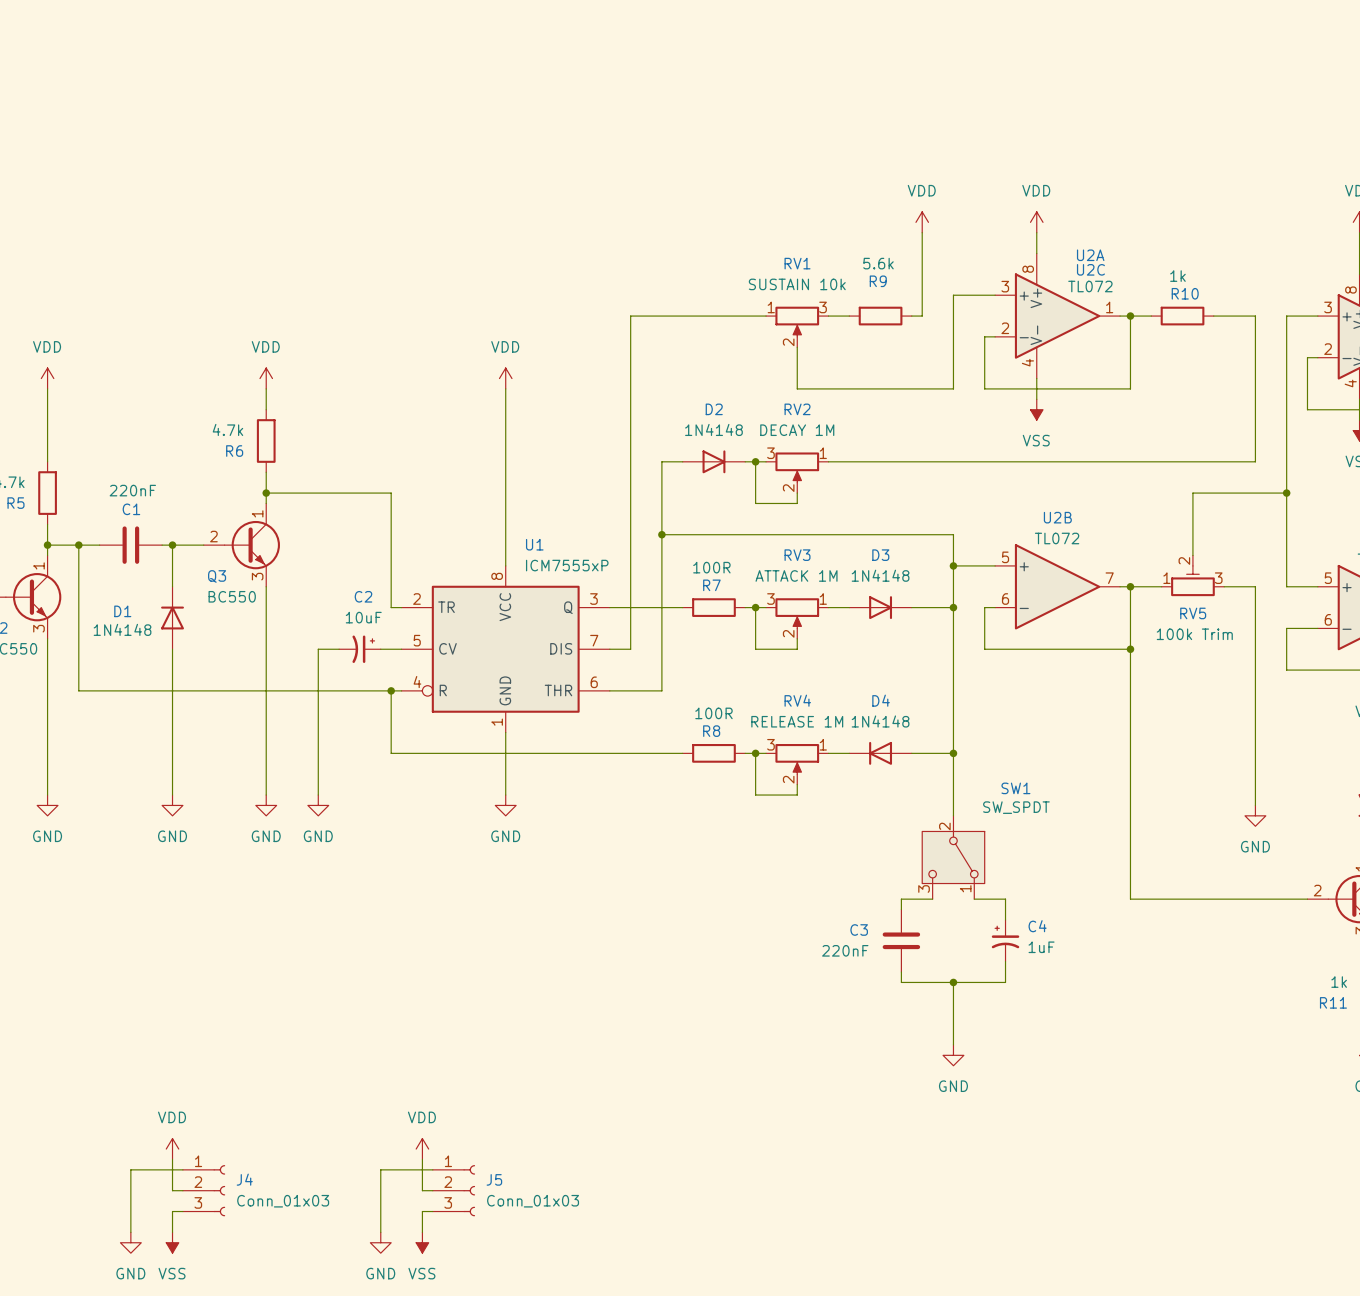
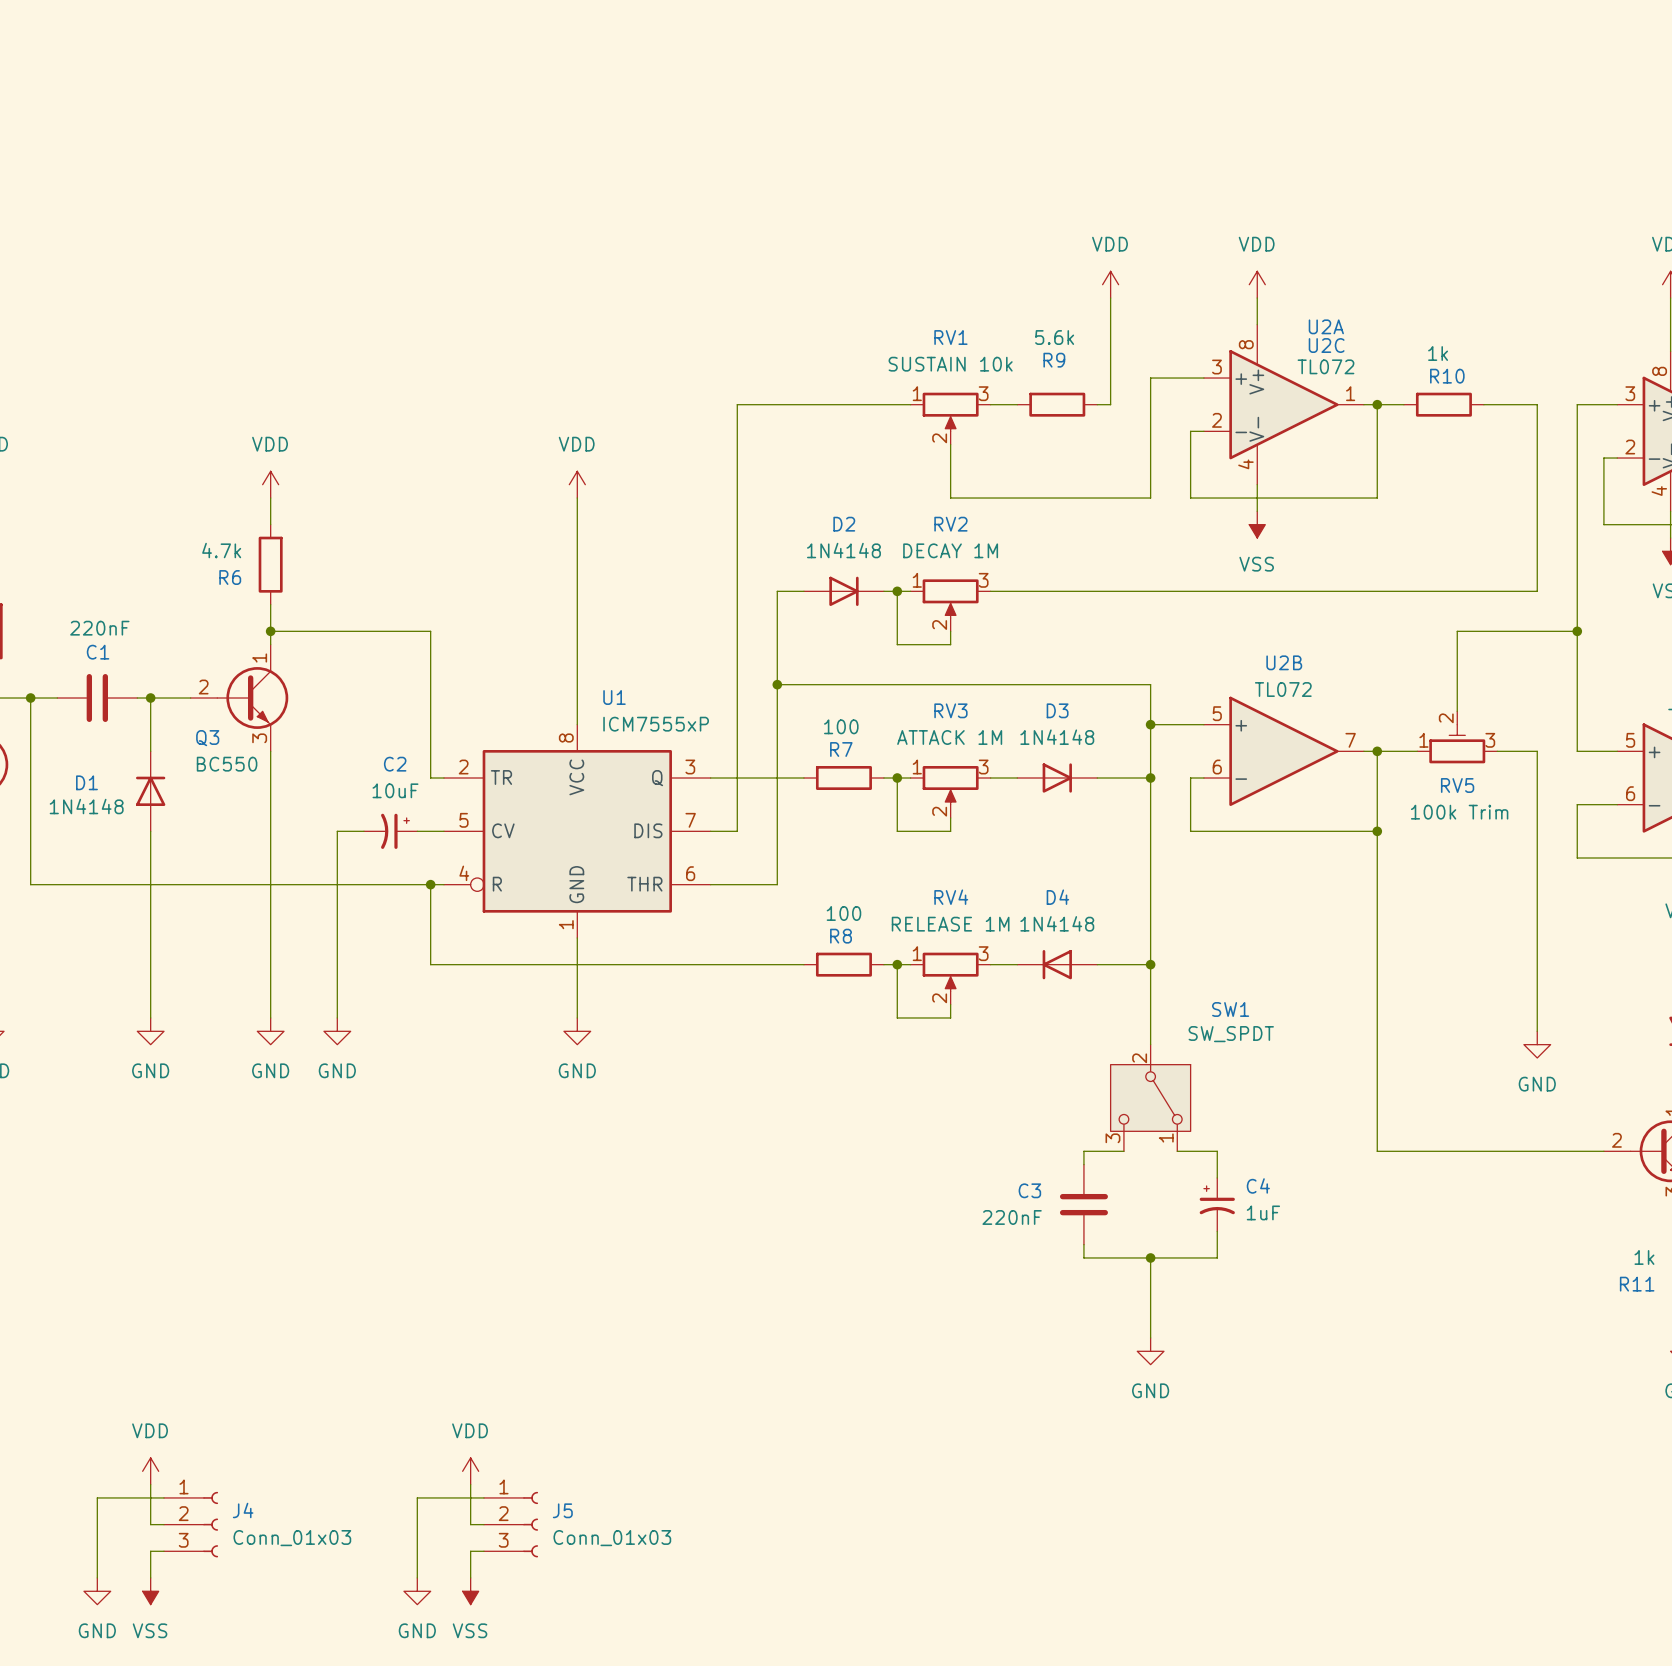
RV2 flip: as is (797, 467) -> left-right (950, 598)
R7 value: 100R (711, 567) -> 100 (841, 726)
RV3 flip: as is (797, 613) -> left-right (950, 785)
R8 value: 100R (713, 713) -> 100 (843, 913)
RV4 flip: as is (797, 759) -> left-right (950, 971)

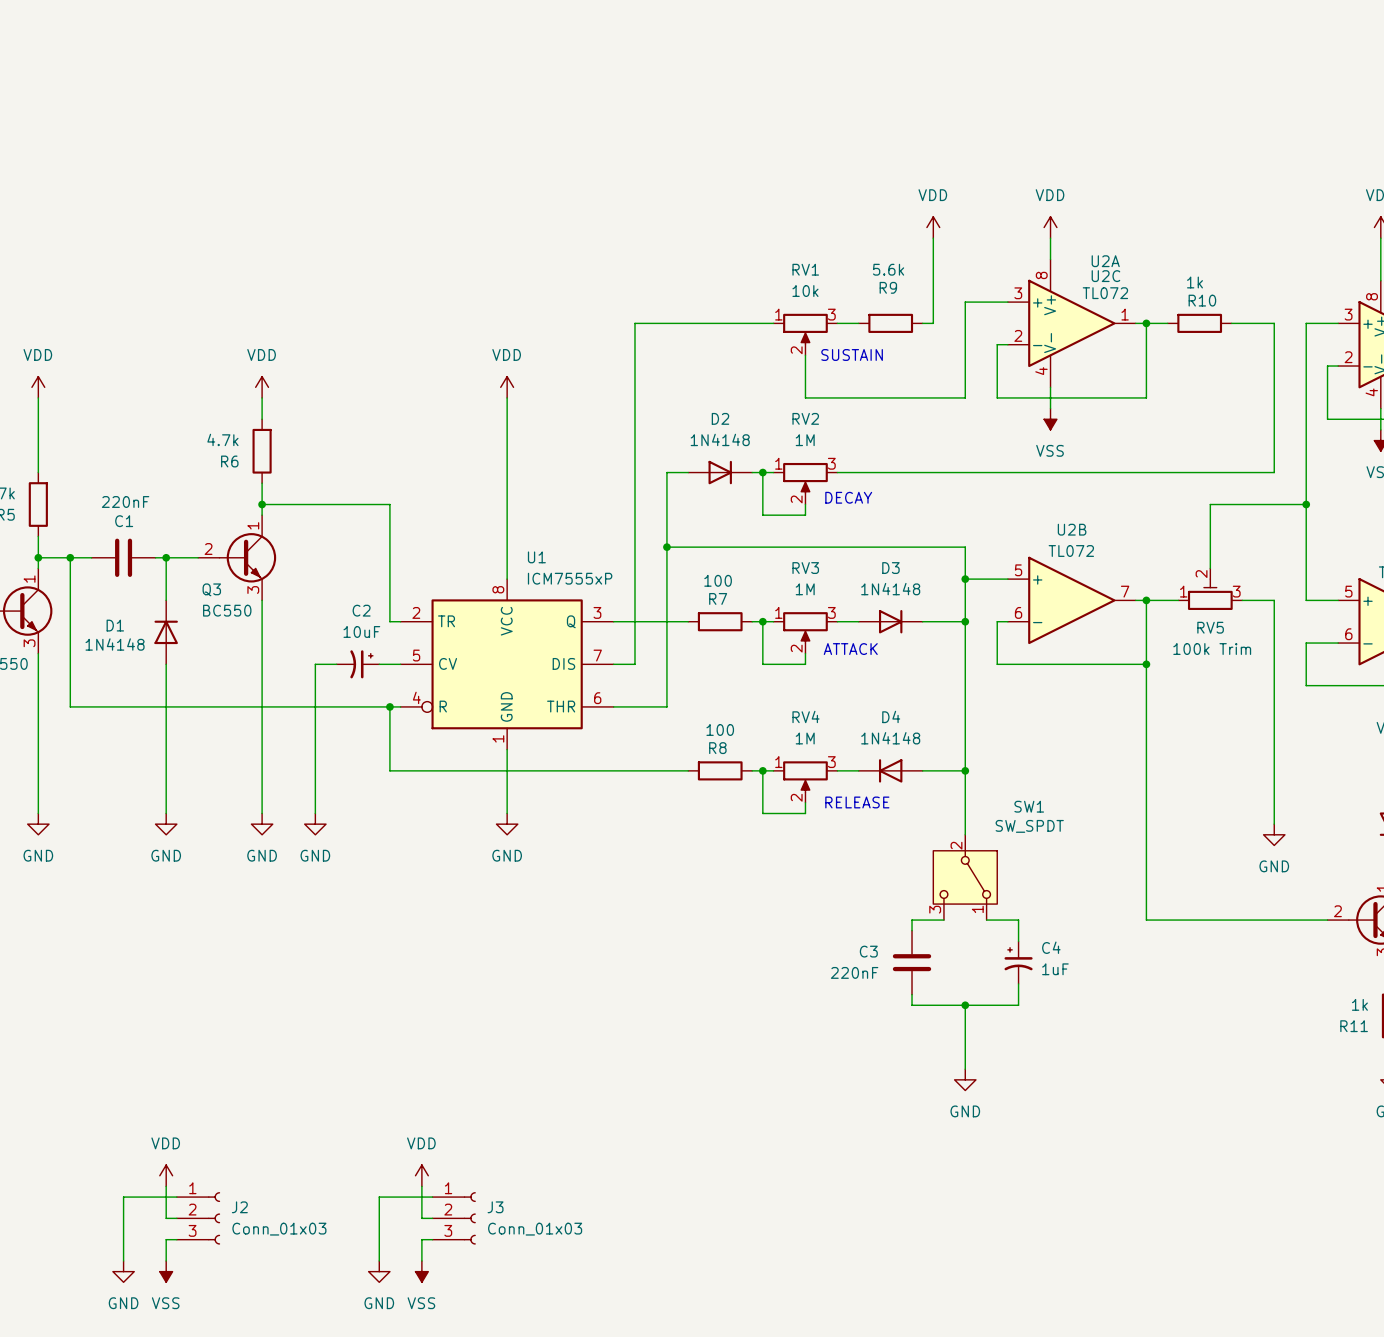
RV1 value: SUSTAIN 10k (950, 364) -> 10k (805, 291)
text: none -> SUSTAIN (852, 354)
RV2 value: DECAY 1M (950, 550) -> 1M (805, 440)
text: none -> DECAY (848, 497)
RV3 value: ATTACK 1M (949, 737) -> 1M (805, 589)
text: none -> ATTACK (850, 649)
RV4 value: RELEASE 1M (950, 924) -> 1M (805, 738)
text: none -> RELEASE (857, 802)
J4 name: J4 (243, 1510) -> J2 (239, 1207)
J5 name: J5 (562, 1510) -> J3 (495, 1207)

